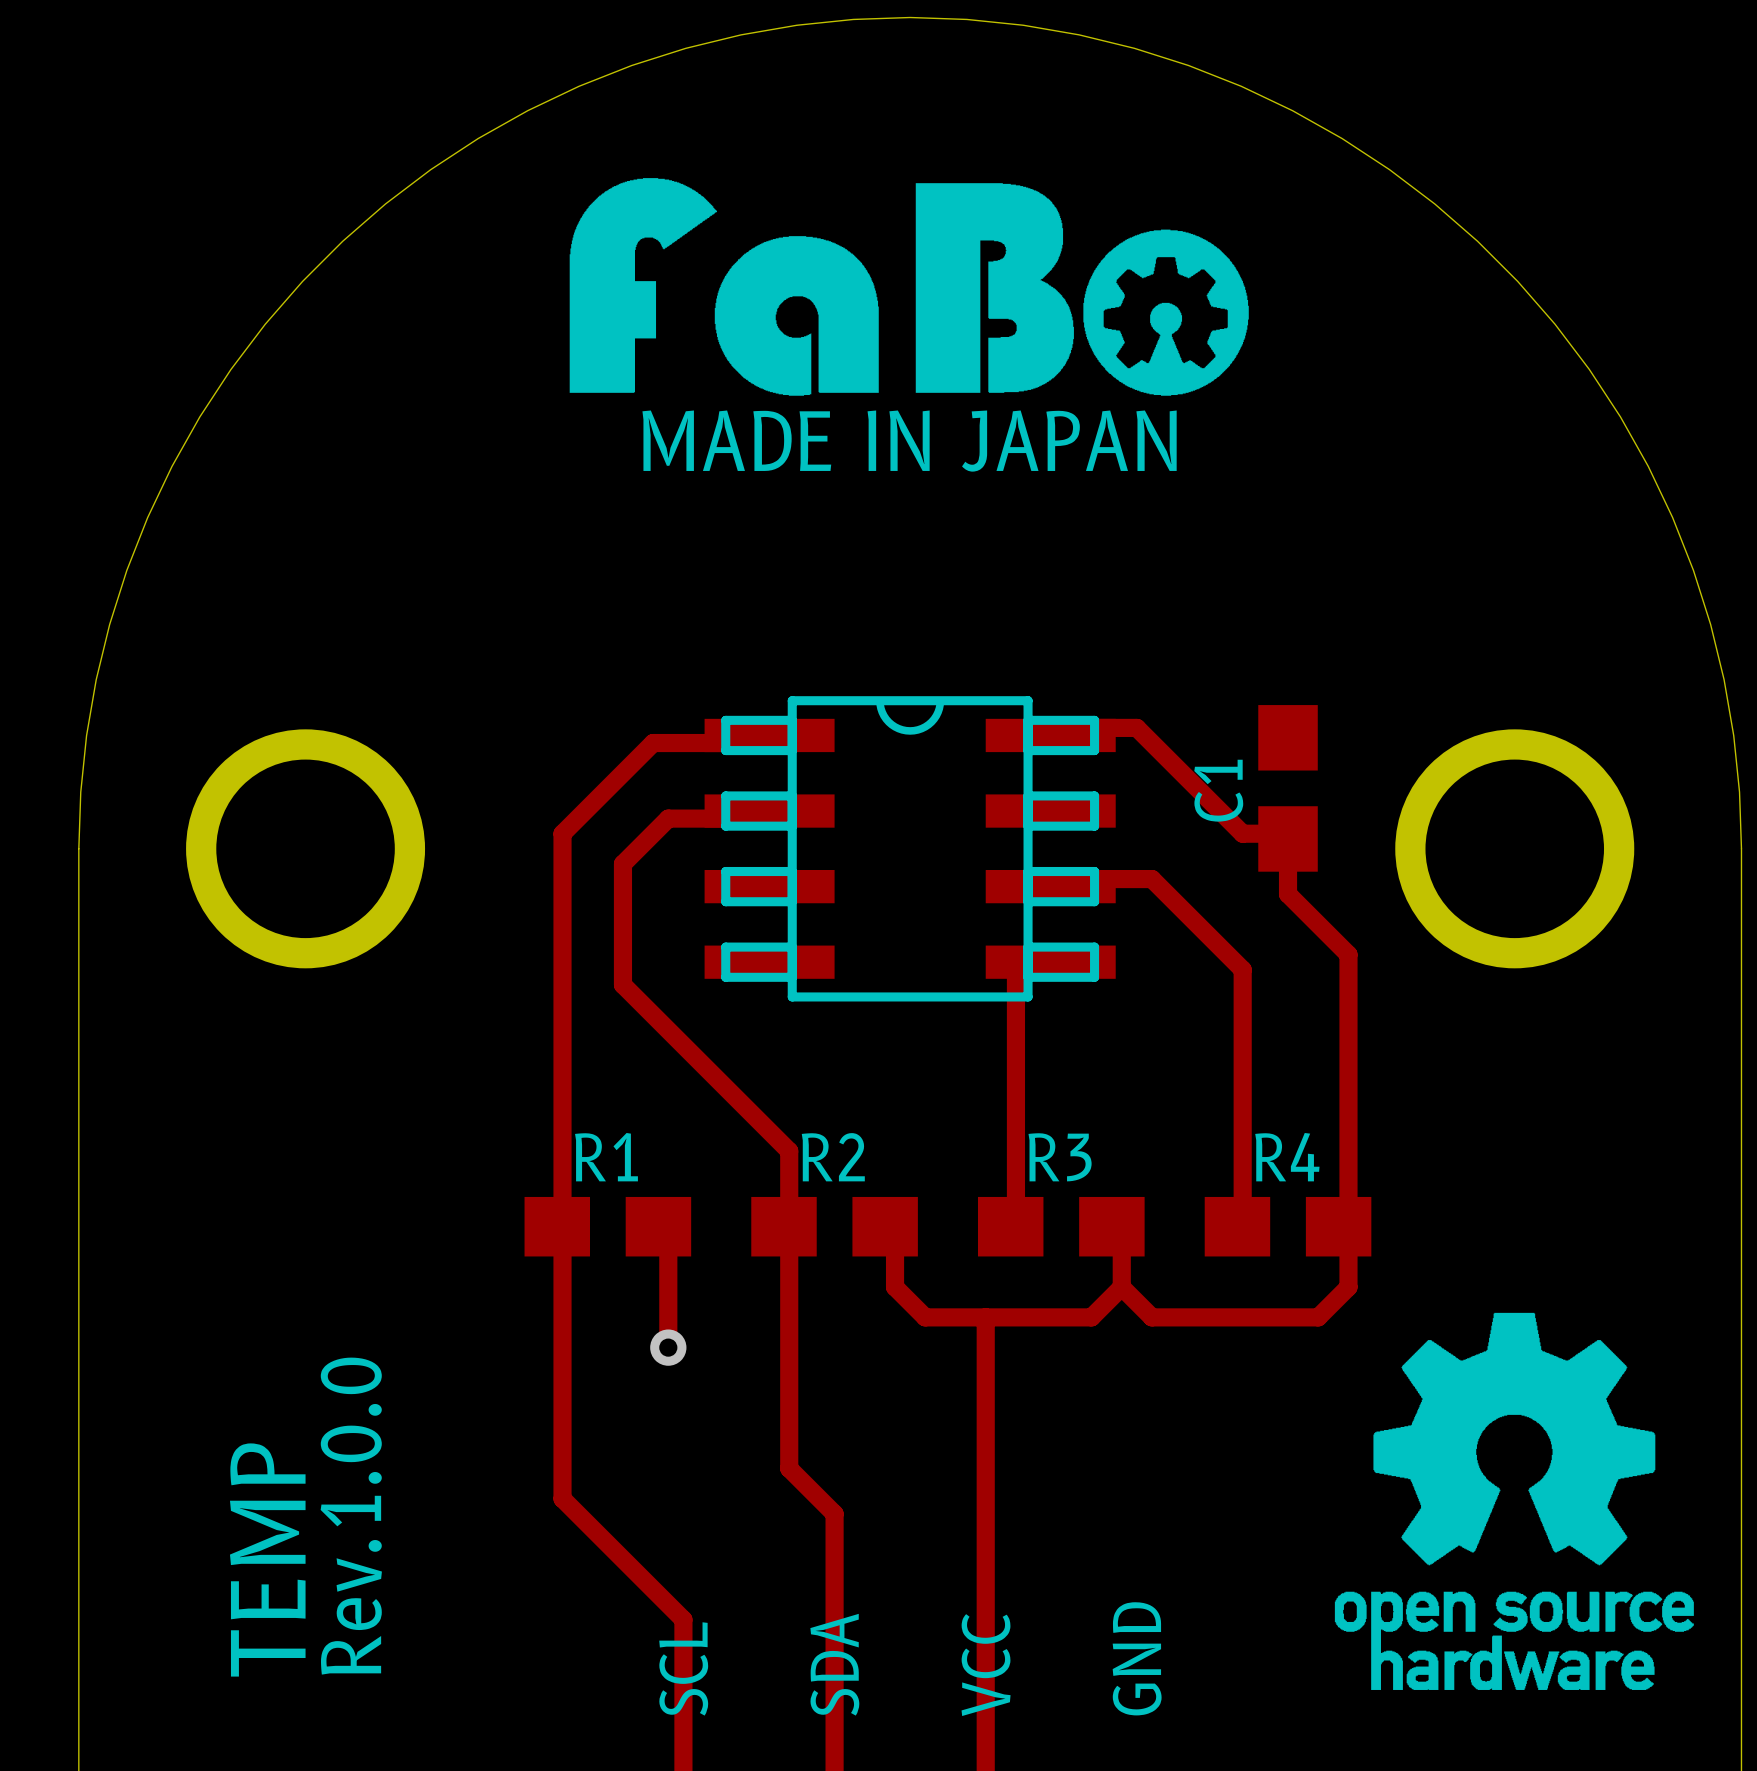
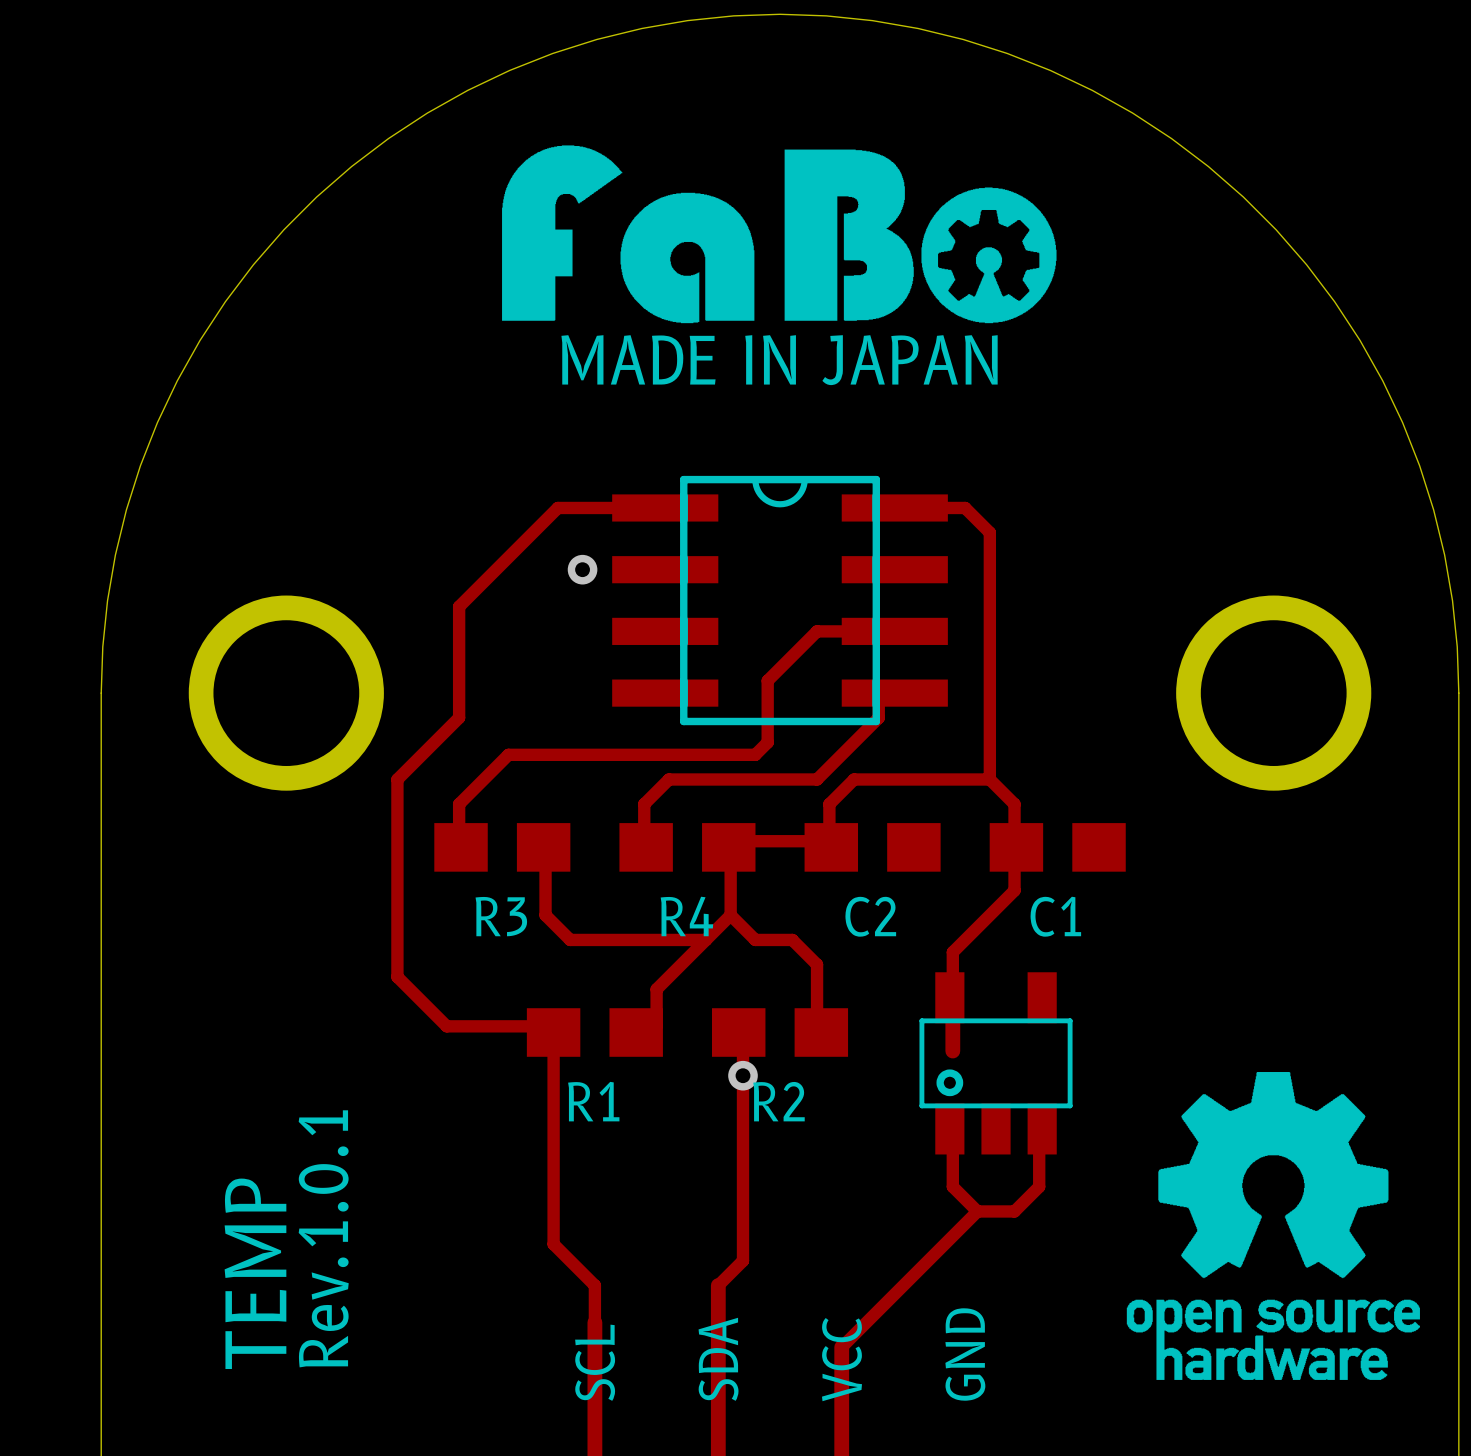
track: none -> (894, 507) (965, 507) (989, 532) (989, 779)
via: none -> (582, 569)
track: (769, 735) (759, 743) (653, 743) (562, 833) (562, 1211) (557, 1226) (562, 1241) (562, 1498) (683, 1619) -> (665, 507) (557, 507) (459, 606) (459, 717) (397, 779) (397, 976) (446, 1026) (547, 1026) (553, 1032) (553, 1244) (594, 1285) (594, 1322)
part: none -> (780, 600)
track: (1050, 735) (1061, 727) (1136, 727) (1242, 833) (1272, 833) (1288, 838) (1288, 894) (1348, 954) (1348, 1211) (1338, 1226) (1348, 1241) (1348, 1287) (1318, 1317) (1151, 1317) (1121, 1287) (1091, 1317) (925, 1317) (895, 1287) (895, 1241) (885, 1226) -> none
track: none -> (894, 631) (817, 631) (767, 680) (767, 742) (755, 754) (508, 754) (459, 804) (459, 845) (461, 847)
C1 rotation: 0° (1288, 788) -> 90° clockwise (1057, 847)
C1 position: (1288, 788) -> (1057, 847)
track: (769, 811) (759, 818) (668, 818) (622, 863) (622, 984) (789, 1151) (789, 1211) (783, 1226) (789, 1241) (789, 1468) (834, 1513) (834, 1574) -> (738, 1032) (743, 1036) (743, 1260) (718, 1285)
part: (910, 848) -> none
track: none -> (894, 693) (878, 696) (878, 717) (817, 779) (668, 779) (644, 804) (644, 841) (646, 847)
track: (1050, 886) (1061, 879) (1151, 879) (1242, 969) (1242, 1211) (1237, 1226) -> none
track: none -> (989, 779) (854, 779) (829, 804) (831, 847)
track: none -> (989, 779) (1014, 804) (1014, 845) (1016, 847) (1014, 849) (1014, 890) (952, 952) (952, 997) (949, 997)
track: (1050, 962) (1046, 969) (1015, 969) (1015, 1211) (1010, 1226) -> none
track: none -> (831, 843) (829, 841) (734, 841) (728, 847) (730, 915)
track: none -> (543, 847) (545, 849) (545, 915) (570, 939) (705, 939)
C2: none -> (872, 847)
track: none -> (730, 915) (656, 989) (656, 1026) (636, 1032)
track: none -> (730, 915) (755, 939) (792, 939) (817, 964) (817, 1026) (821, 1032)
R1 name position: R1 (606, 1157) -> R1 (593, 1101)
R2 name position: R2 (833, 1157) -> R2 (778, 1101)
R3 name position: R3 (1060, 1157) -> R3 (501, 916)
R4 name position: R4 (1287, 1157) -> R4 (686, 916)
R1 position: (607, 1226) -> (594, 1032)
track: (658, 1226) (668, 1226) (668, 1347) -> none
R2 position: (834, 1226) -> (780, 1032)
R3 position: (1061, 1226) -> (502, 847)
R4 position: (1288, 1226) -> (687, 847)
part: none -> (996, 1063)
track: (985, 1317) (985, 1649) -> (977, 1211) (841, 1347)
via position: (668, 1347) -> (743, 1075)
track: none -> (949, 1128) (952, 1131) (952, 1186) (977, 1211)
track: none -> (1042, 1128) (1042, 1146) (1039, 1149) (1039, 1186) (1014, 1211) (977, 1211)
text: Rev.1.0.0 (351, 1516) -> Rev.1.0.1 (323, 1238)

